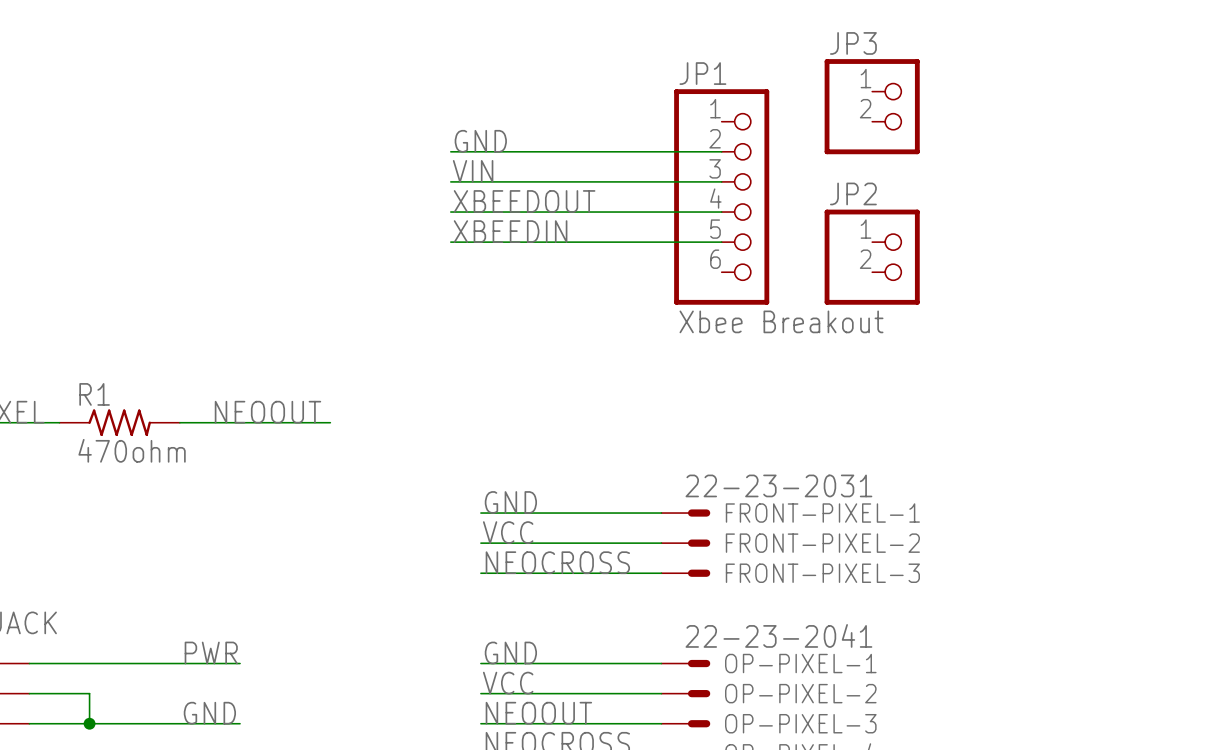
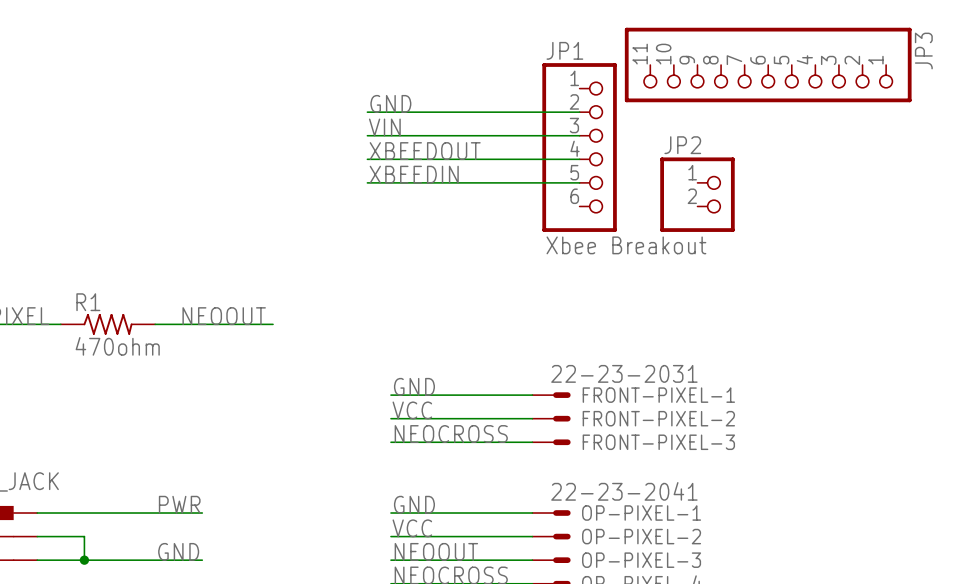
JP3 name position: JP3 (853, 43) -> JP3 (923, 51)
JP3 symbol: [824, 59, 920, 155] -> [624, 27, 912, 103]

